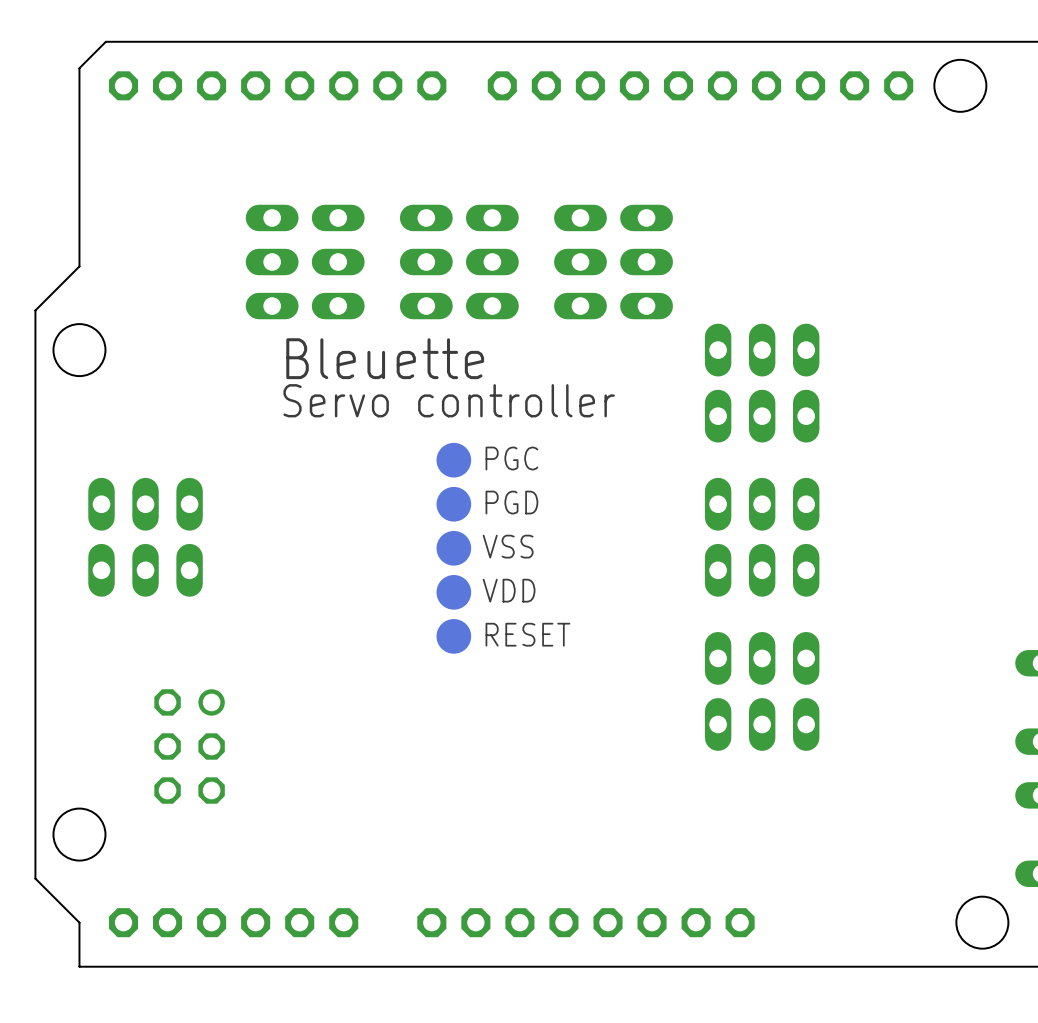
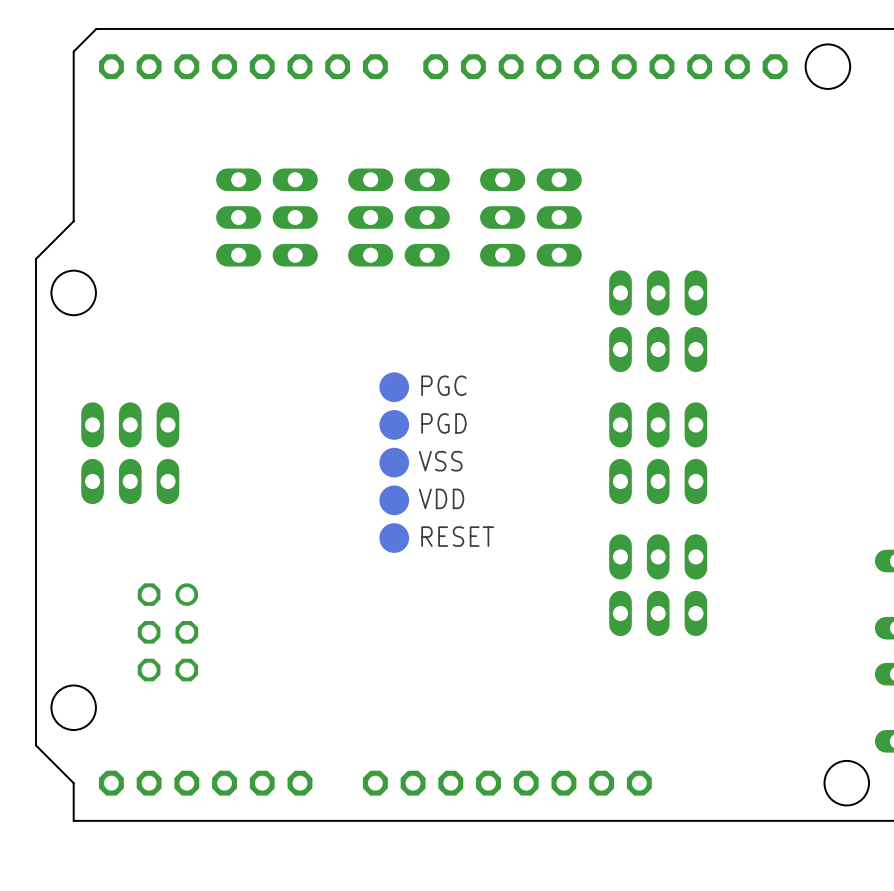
text: Bleuette (385, 358) -> none
text: Servo controller (449, 400) -> none

